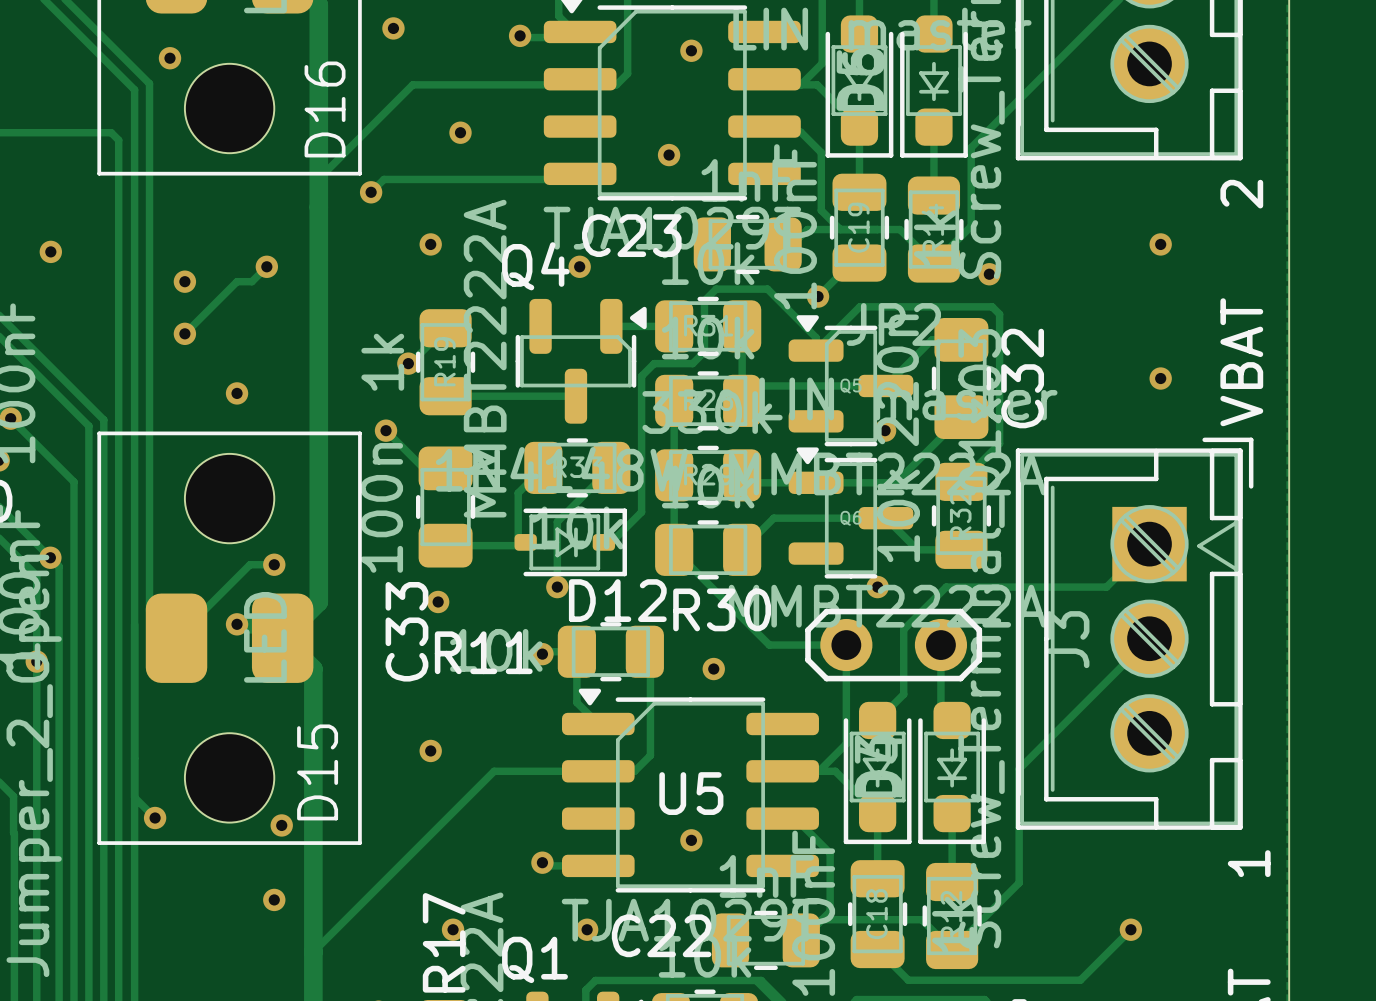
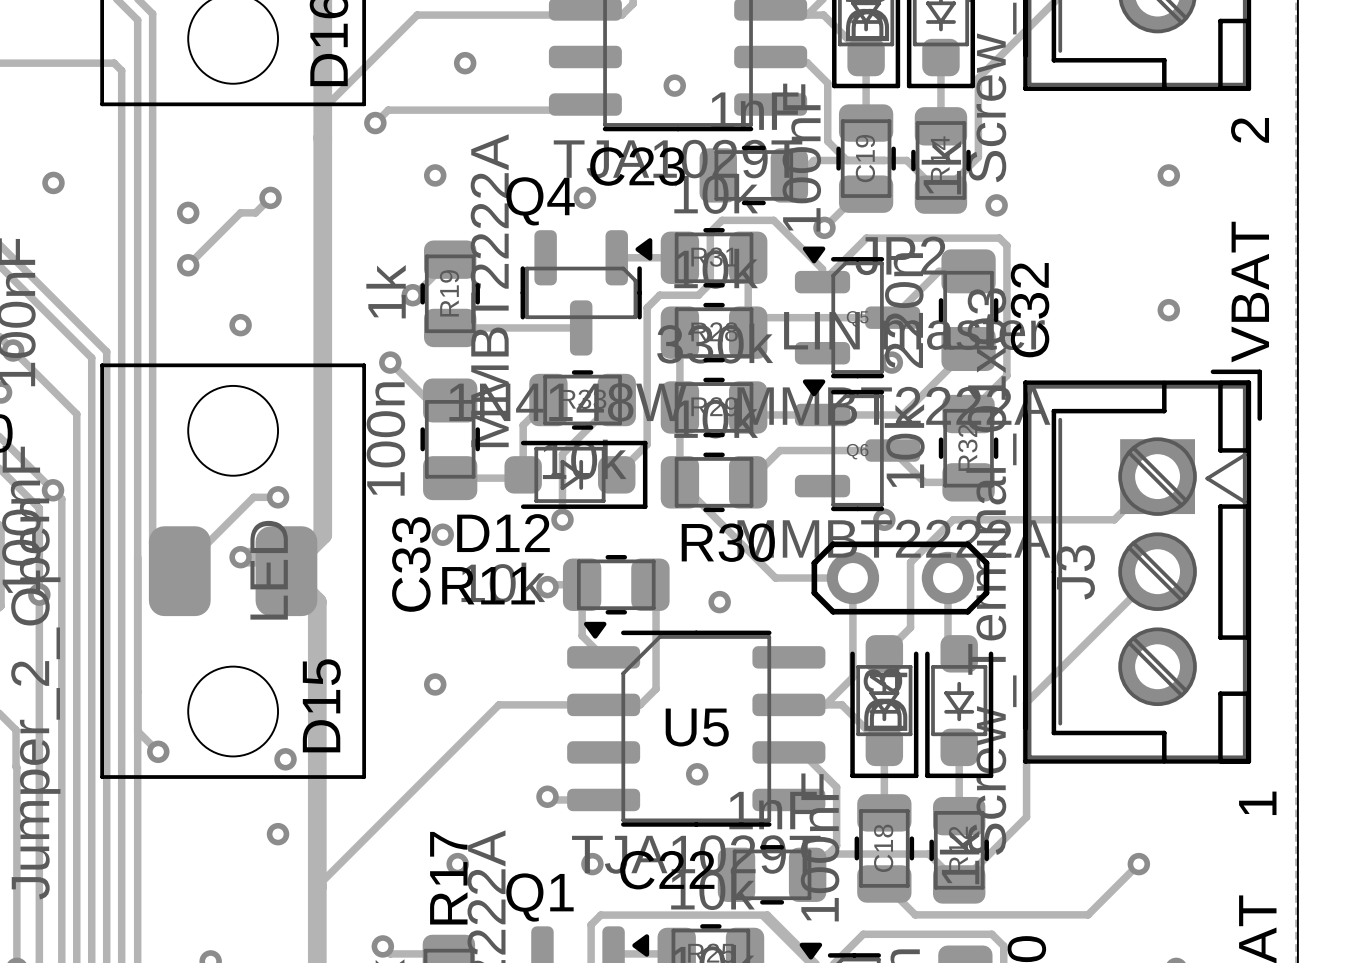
D12 footprint: [514, 508, 627, 577] -> [504, 440, 648, 509]
D12 name position: D12 (617, 600) -> D12 (503, 533)

